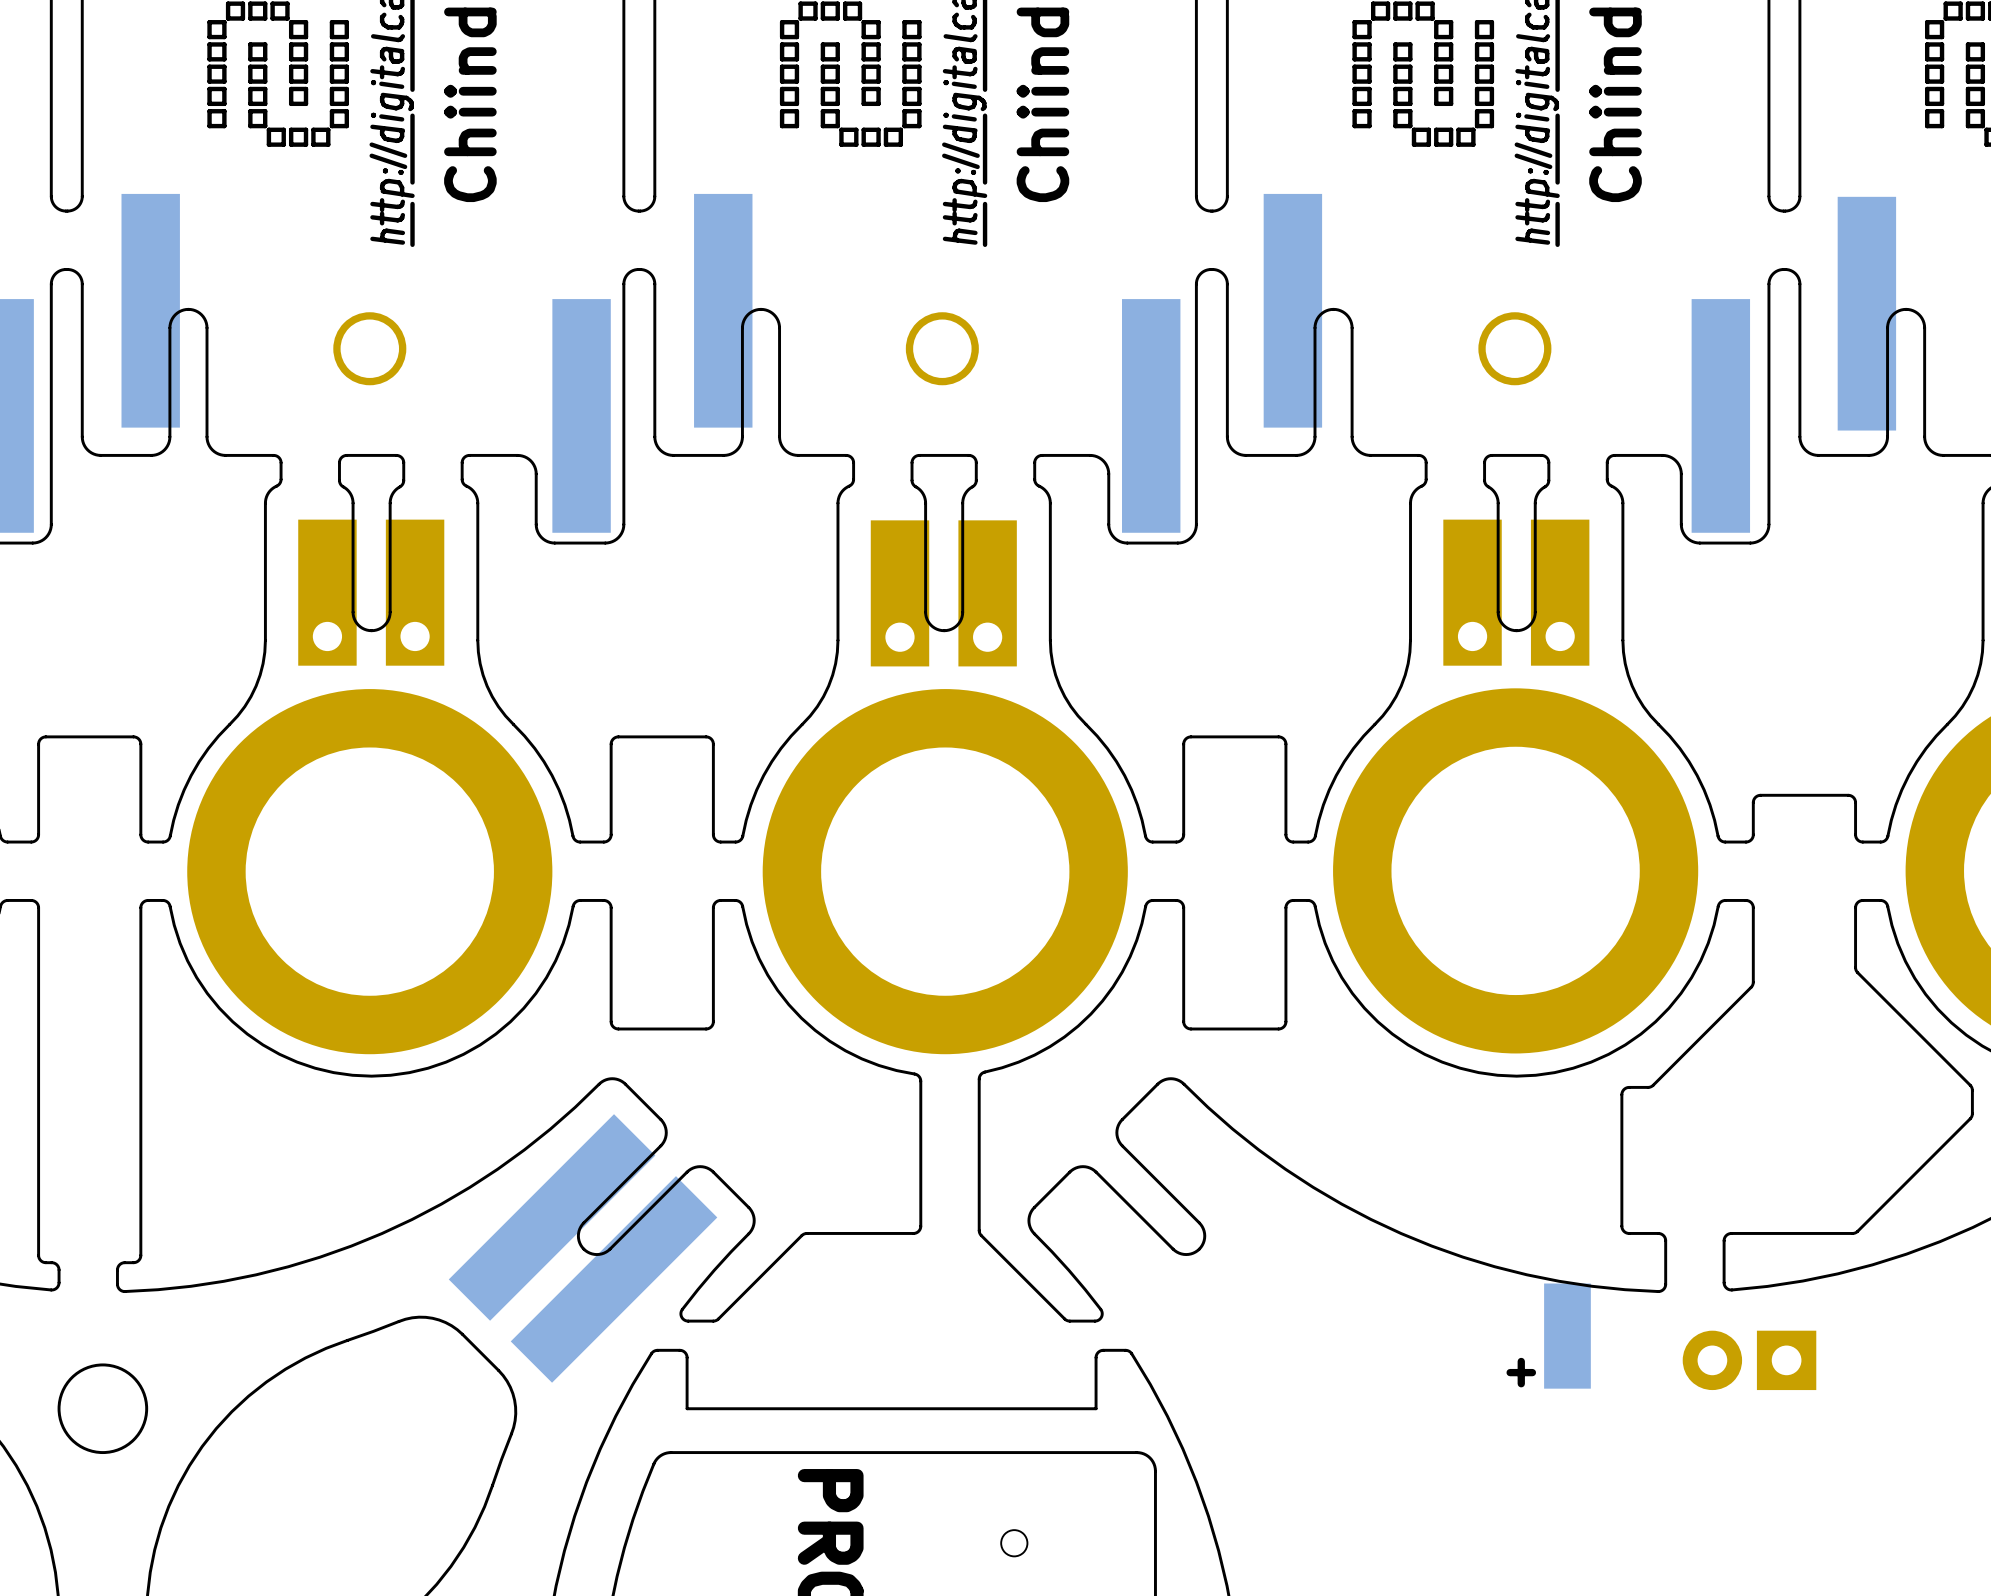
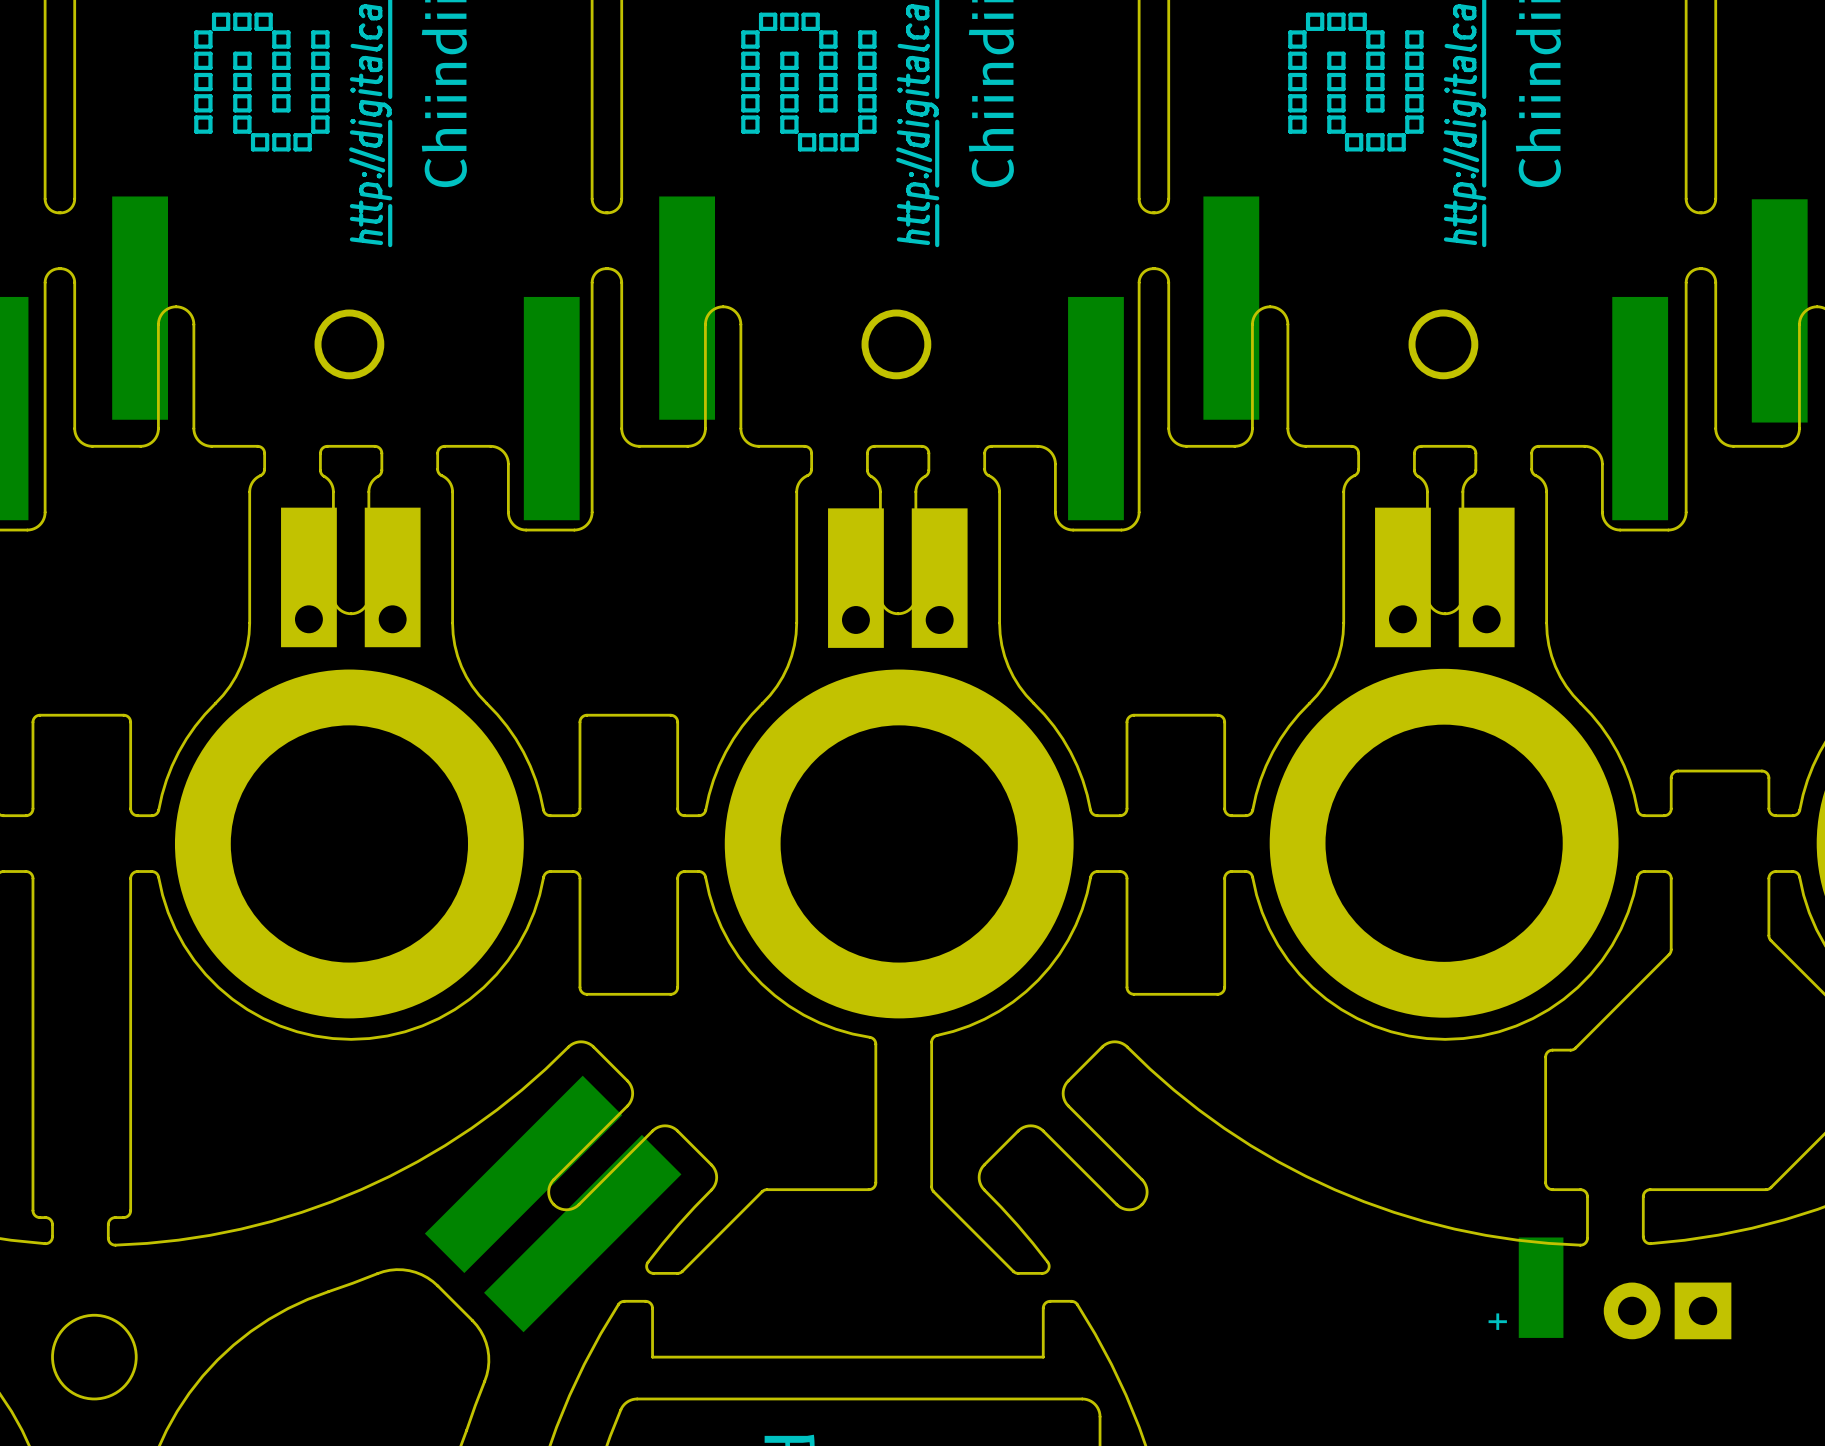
part position: (1567, 1336) -> (1541, 1287)

